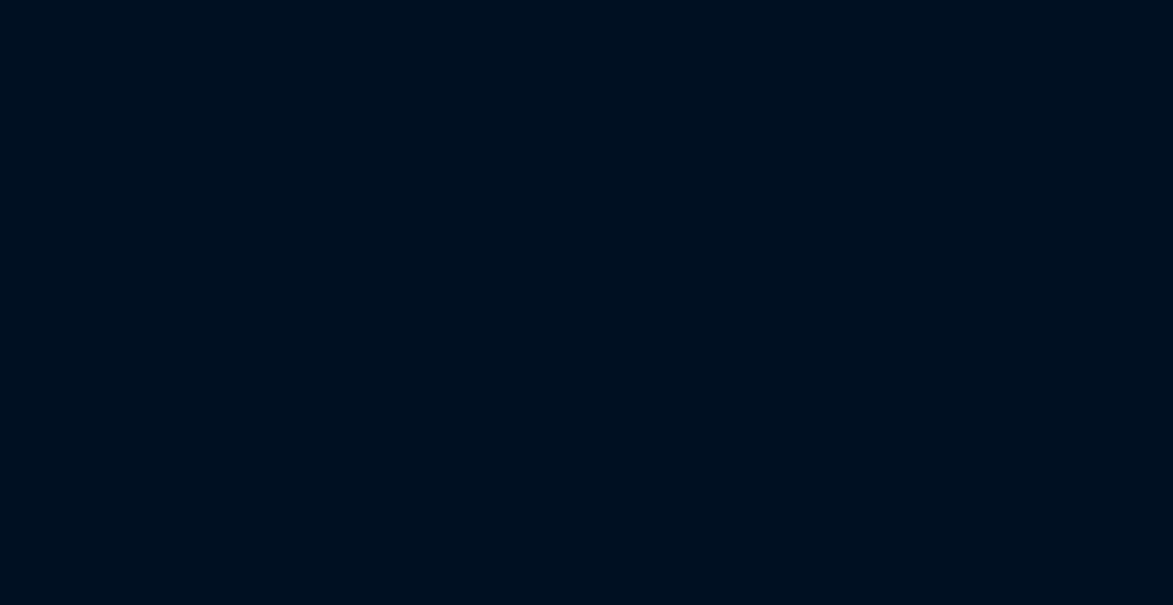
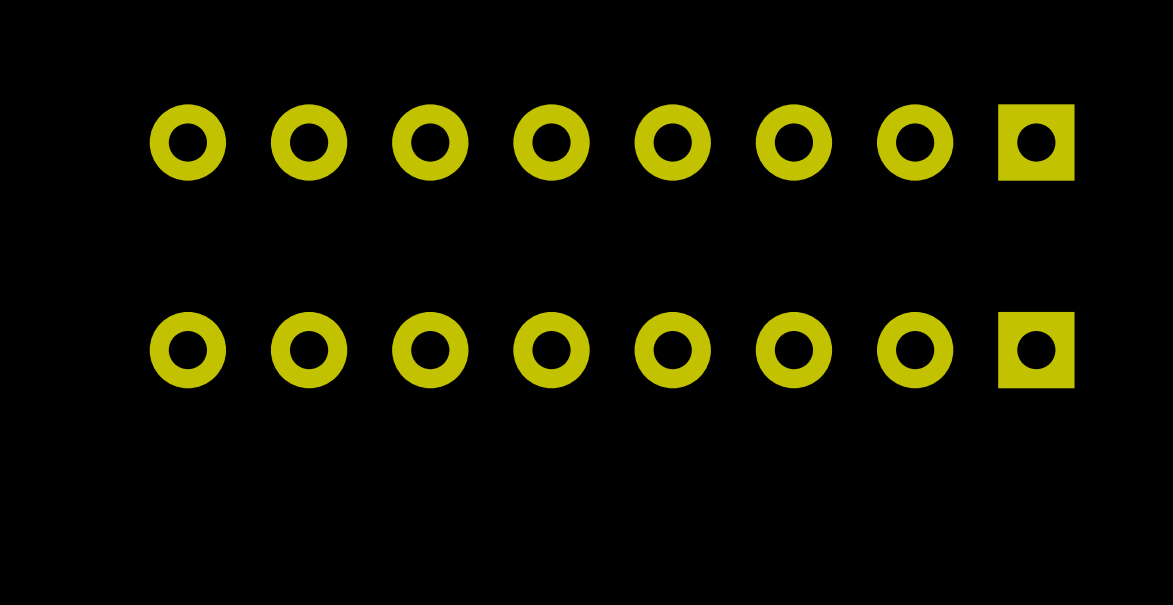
part: none -> (612, 142)
part: none -> (612, 350)

